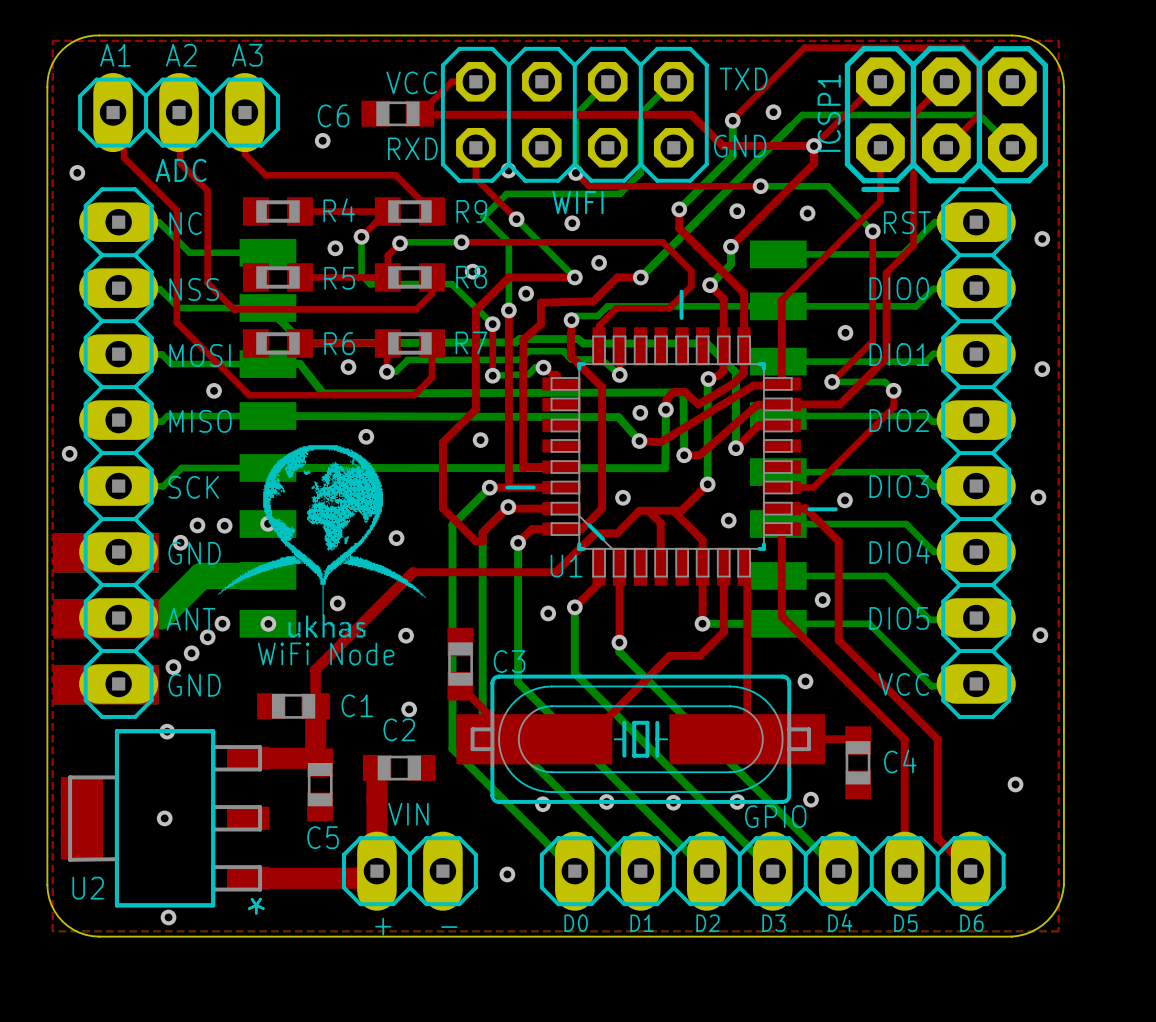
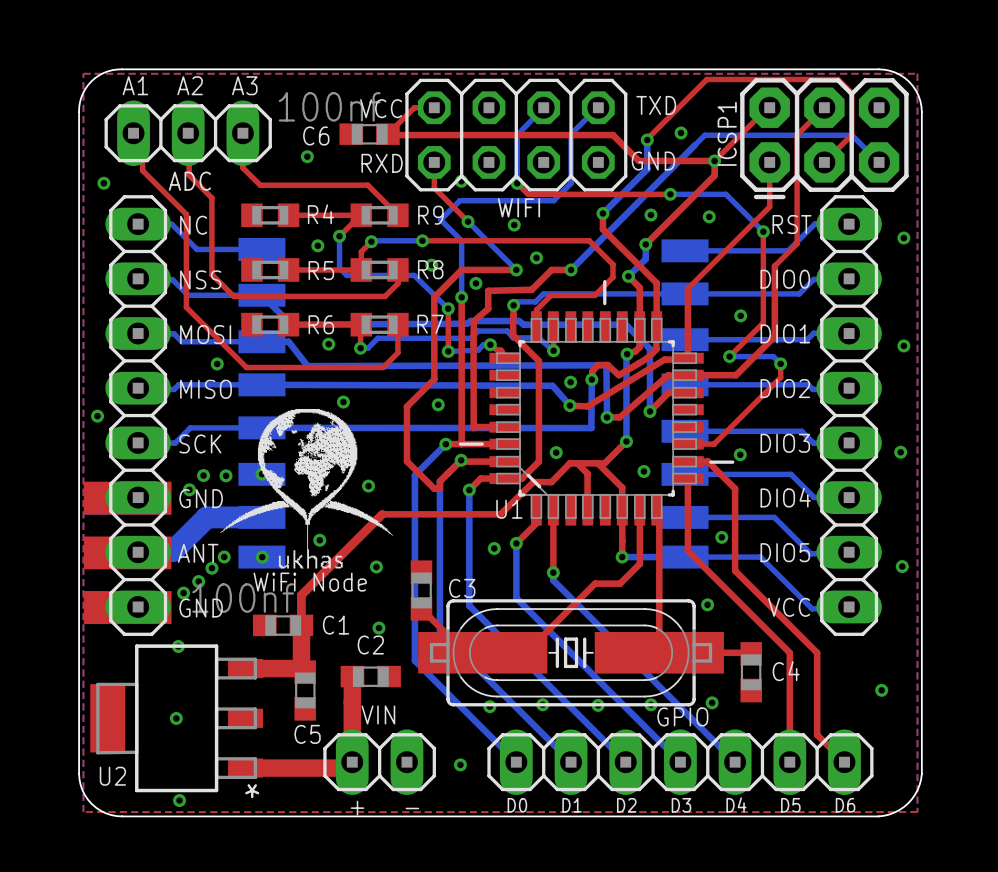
C6 value: none -> 100nf (329, 106)
C1 value: none -> 100nf (243, 598)

